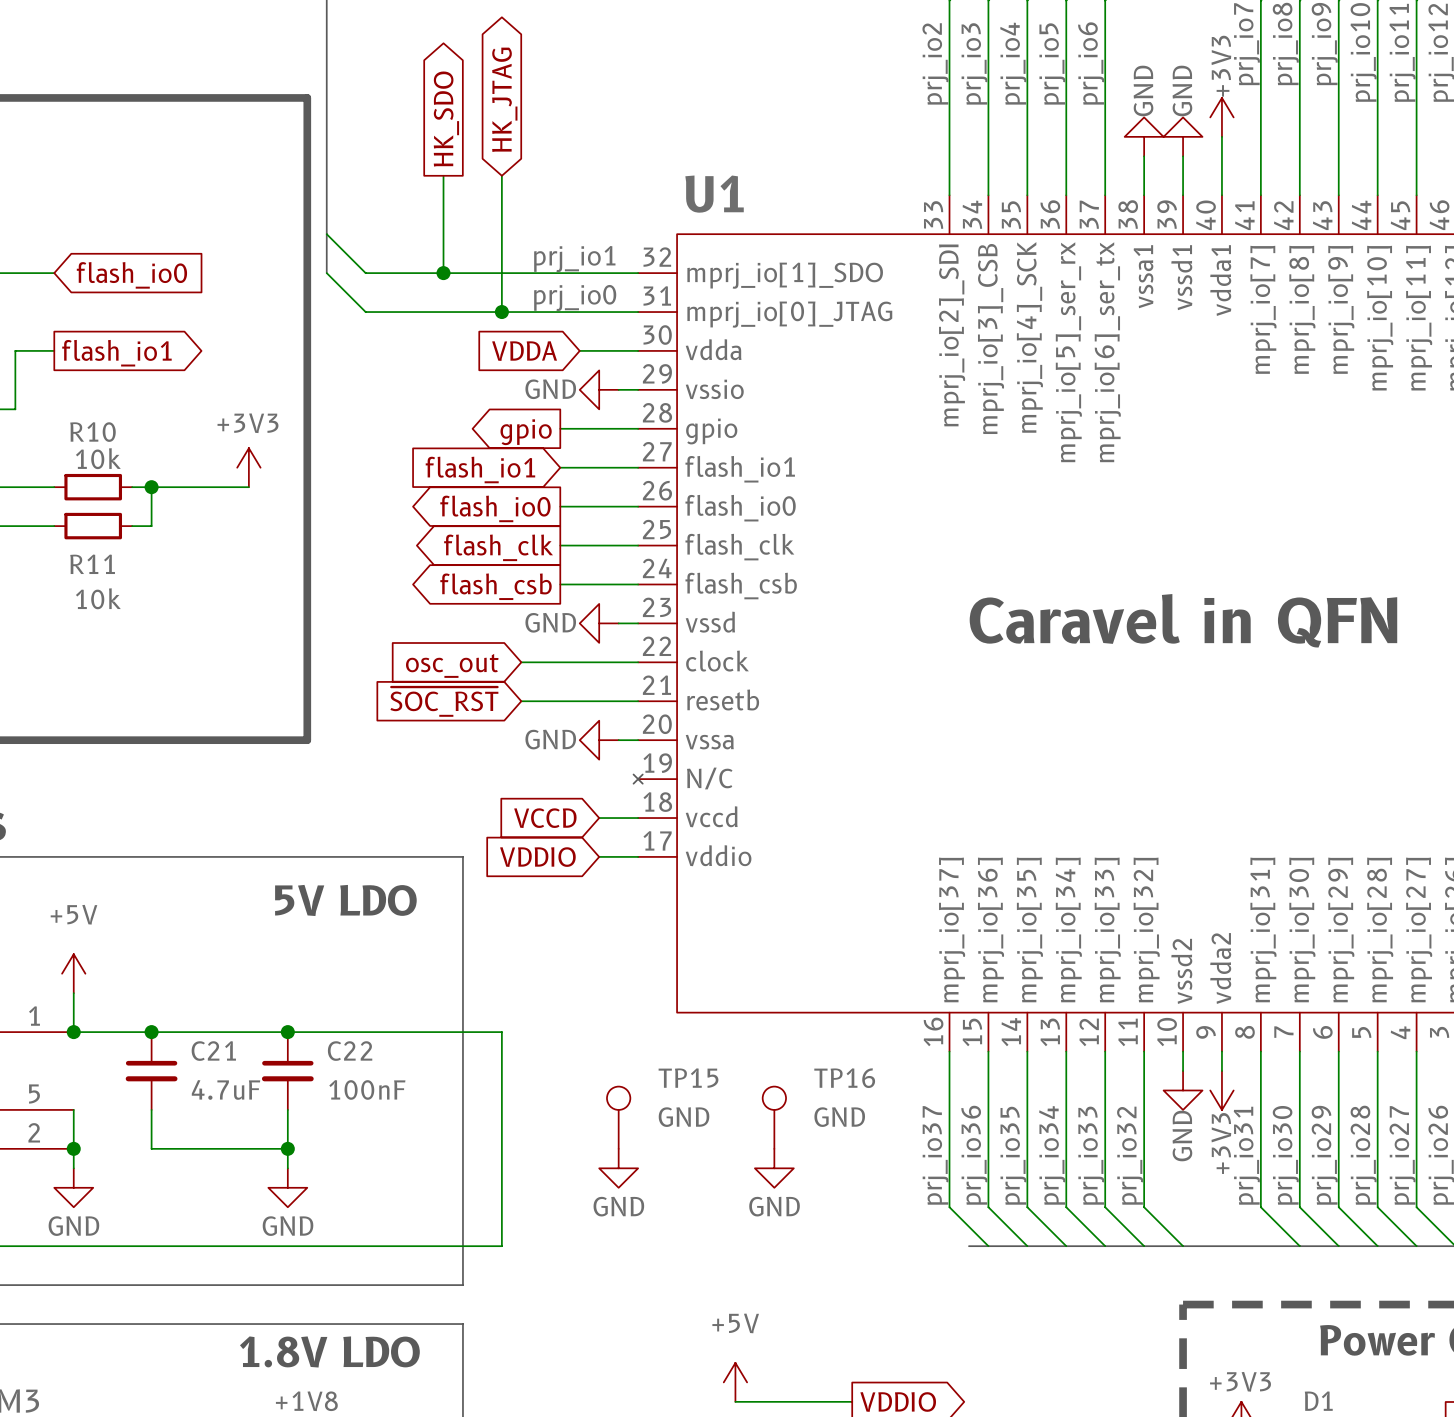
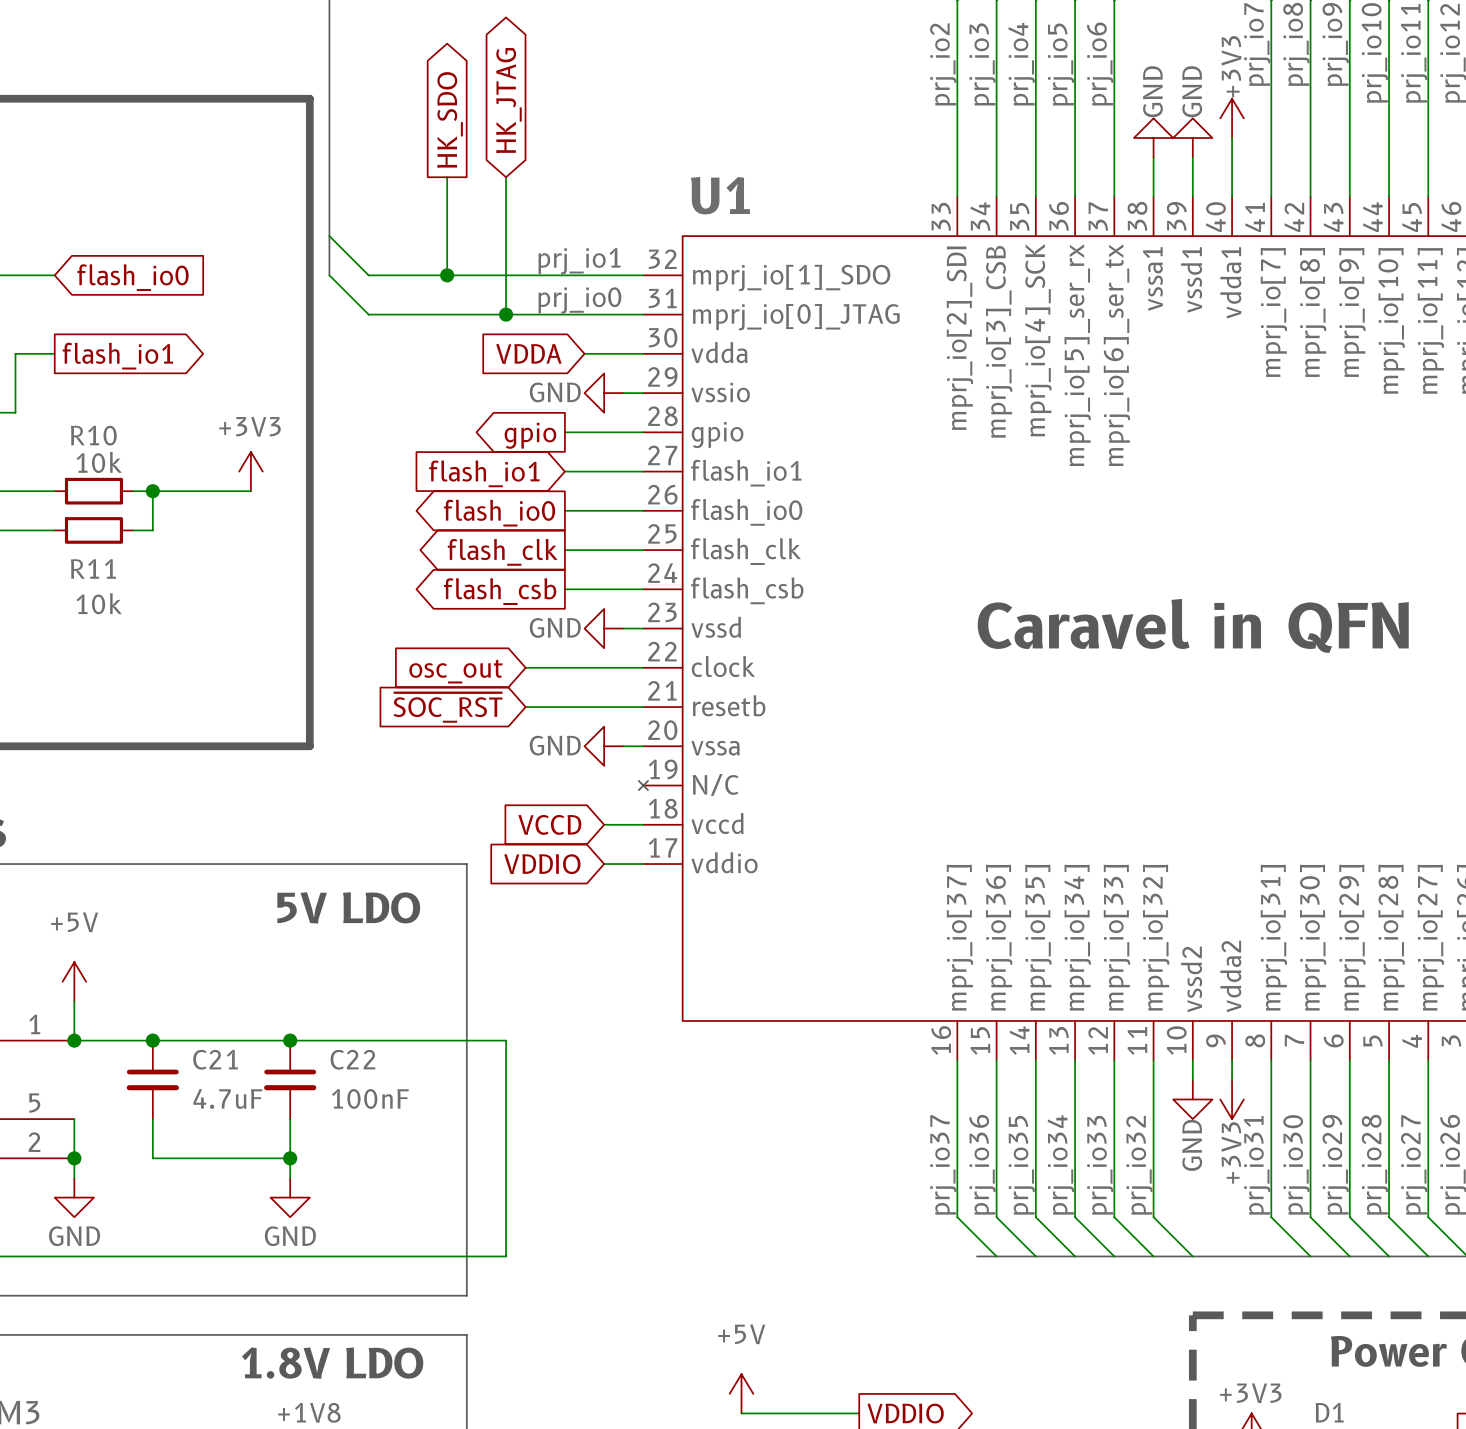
TP15: GND (618, 1117) -> none
TP16: GND (774, 1117) -> none
power symbol: GND (618, 1168) -> none
power symbol: GND (774, 1168) -> none

